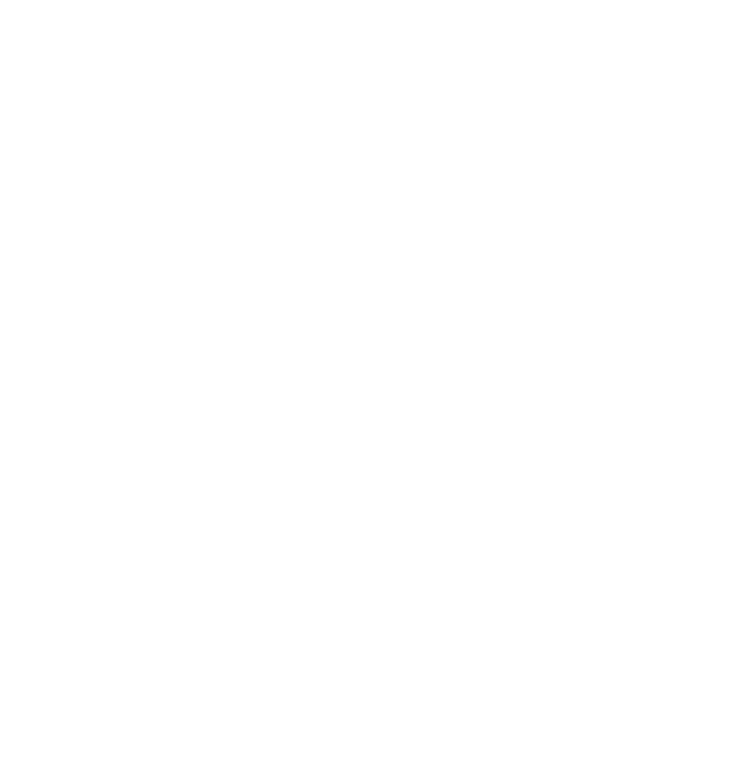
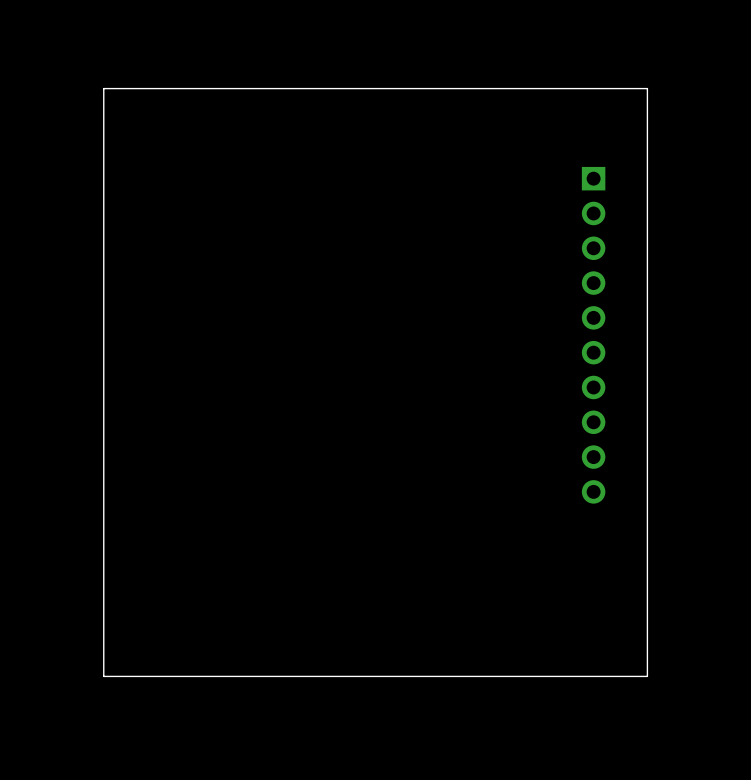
board edge: none -> (647, 88) (103, 88) (103, 676) (647, 676) (647, 88)
part: none -> (593, 335)

